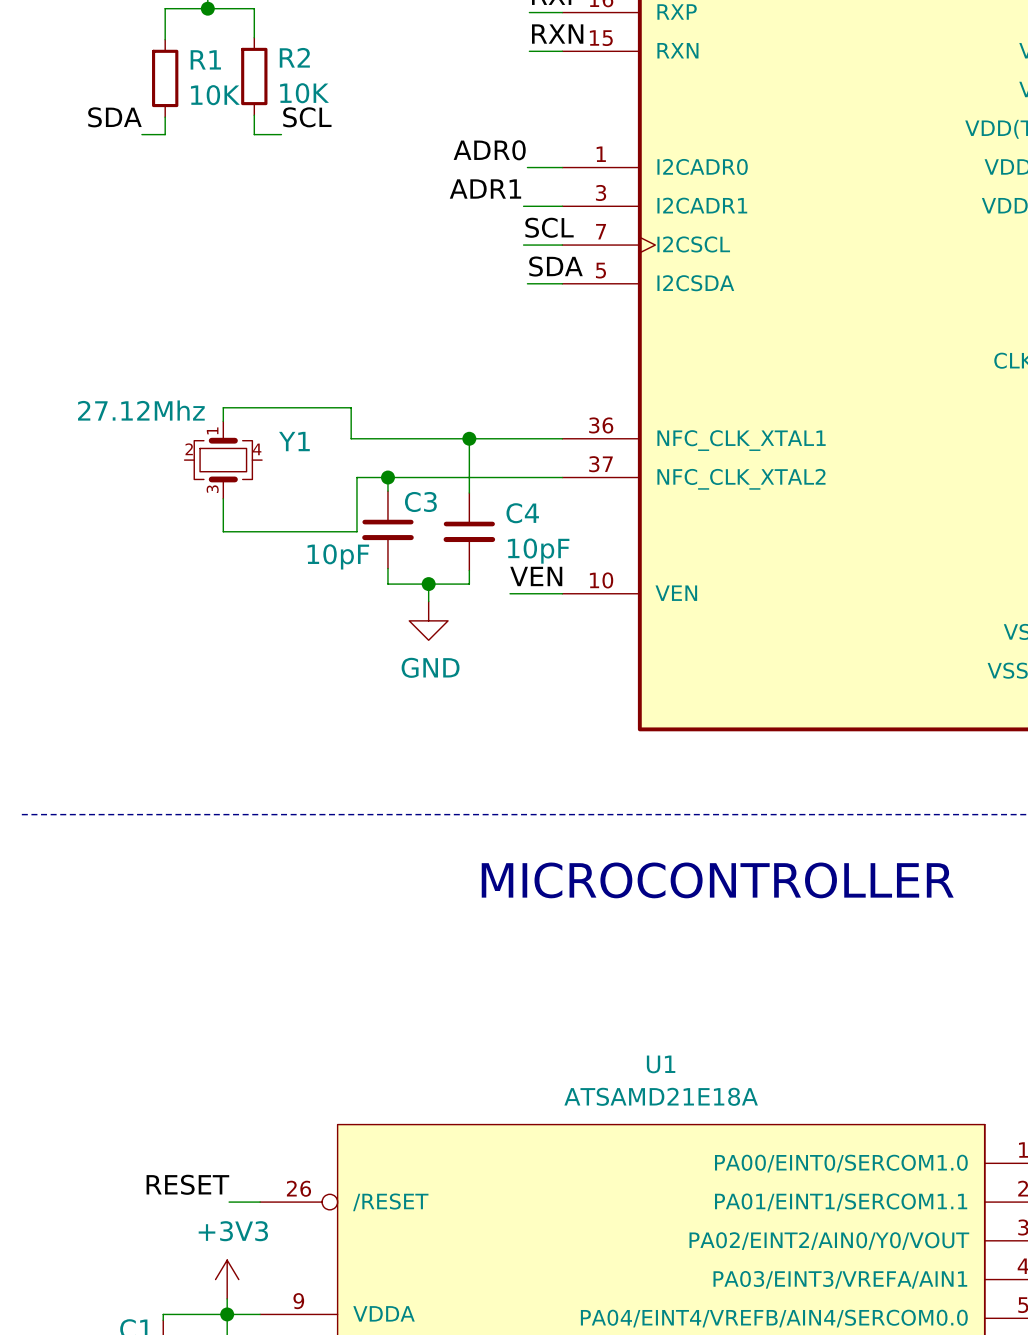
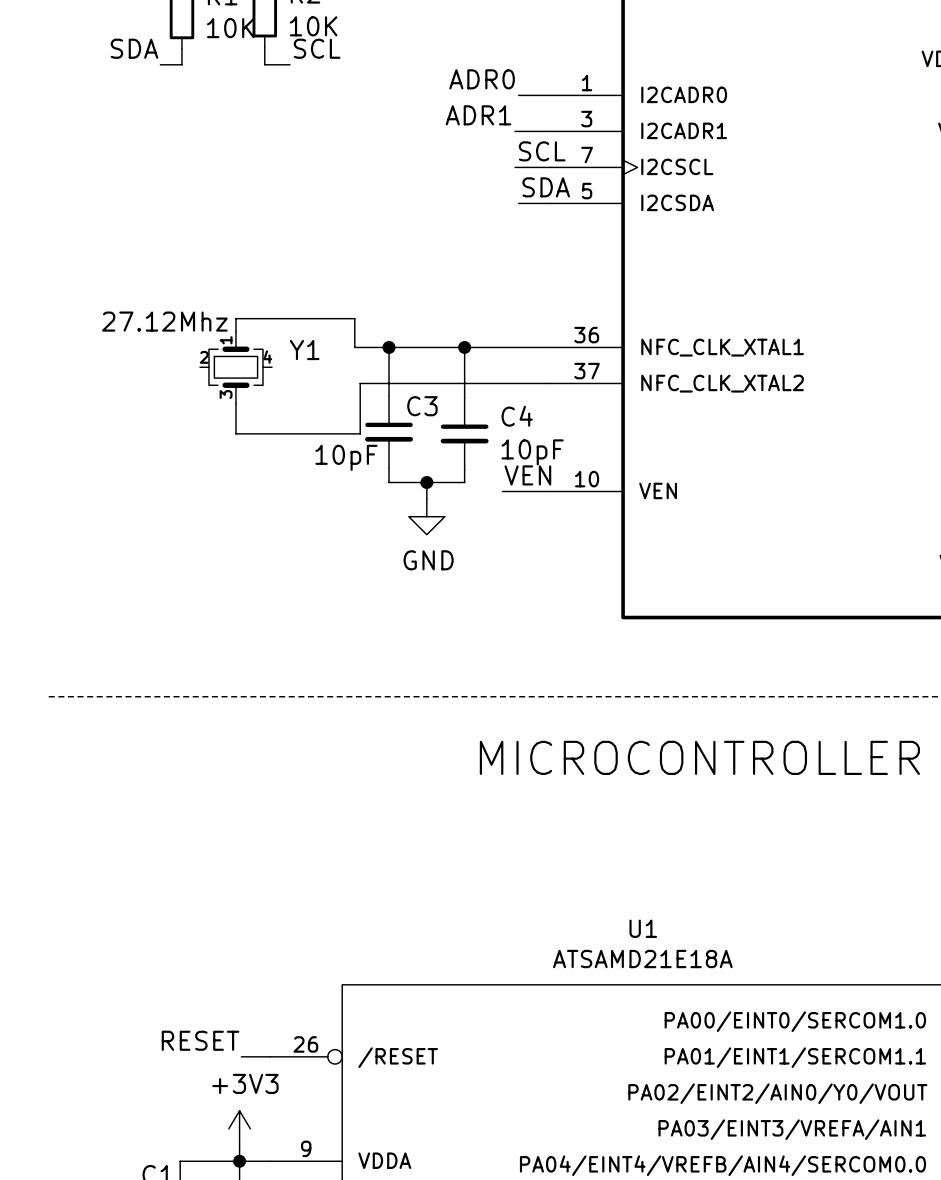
wire: none -> (389, 347) (389, 383)
junction position: (387, 477) -> (389, 347)

